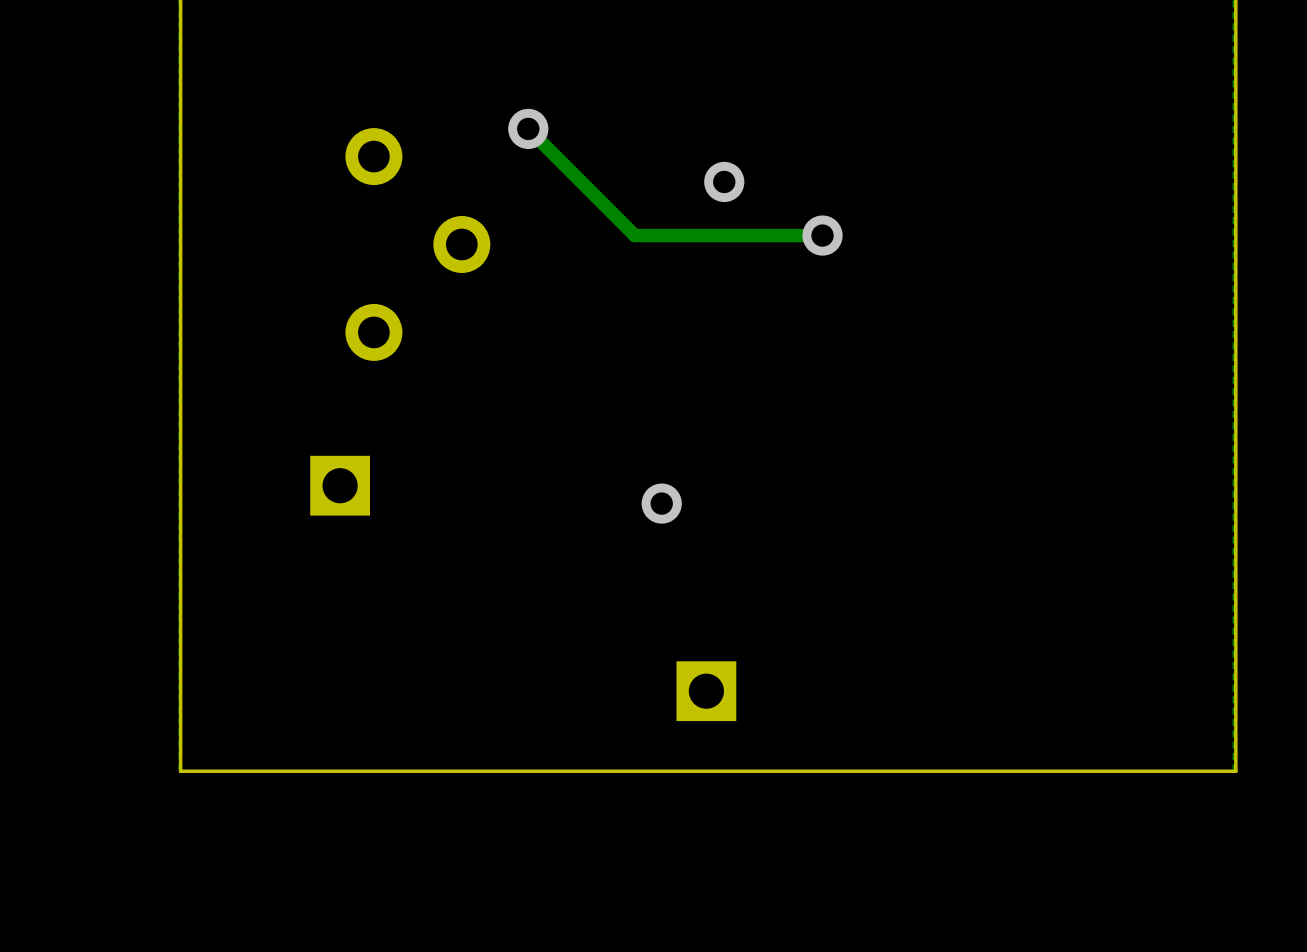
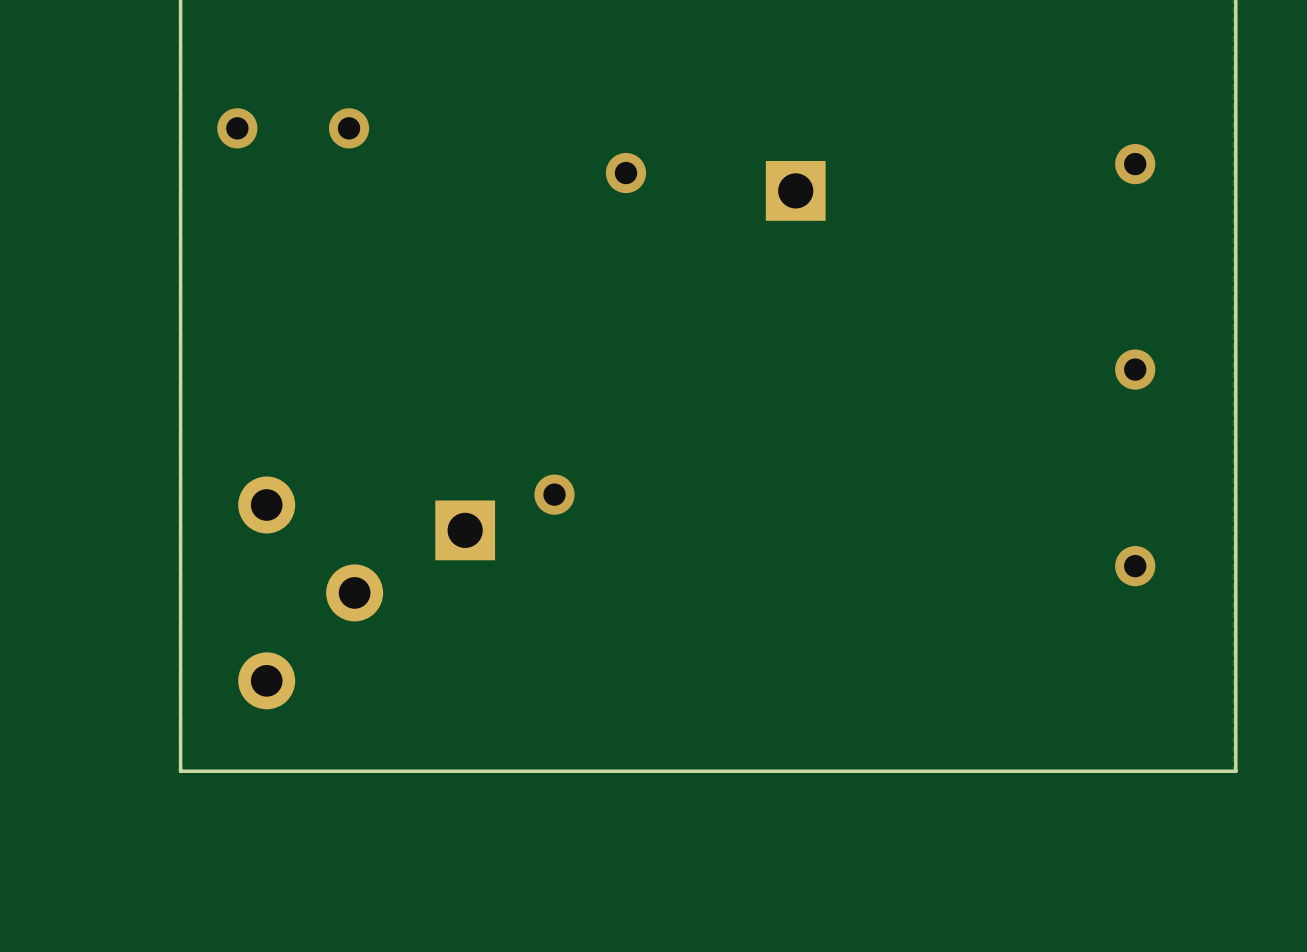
via: none -> (237, 128)
via: none -> (349, 128)
track: (528, 128) (634, 235) (822, 235) -> none
via: (528, 128) -> none
via: none -> (1135, 164)
via: none -> (625, 173)
via: (724, 181) -> none
part: none -> (795, 190)
via: (822, 235) -> none
part: (417, 244) -> none
via: none -> (1135, 369)
part position: (340, 485) -> (465, 530)
via position: (661, 503) -> (554, 494)
via: none -> (1135, 566)
part: none -> (310, 592)
part: (706, 691) -> none

